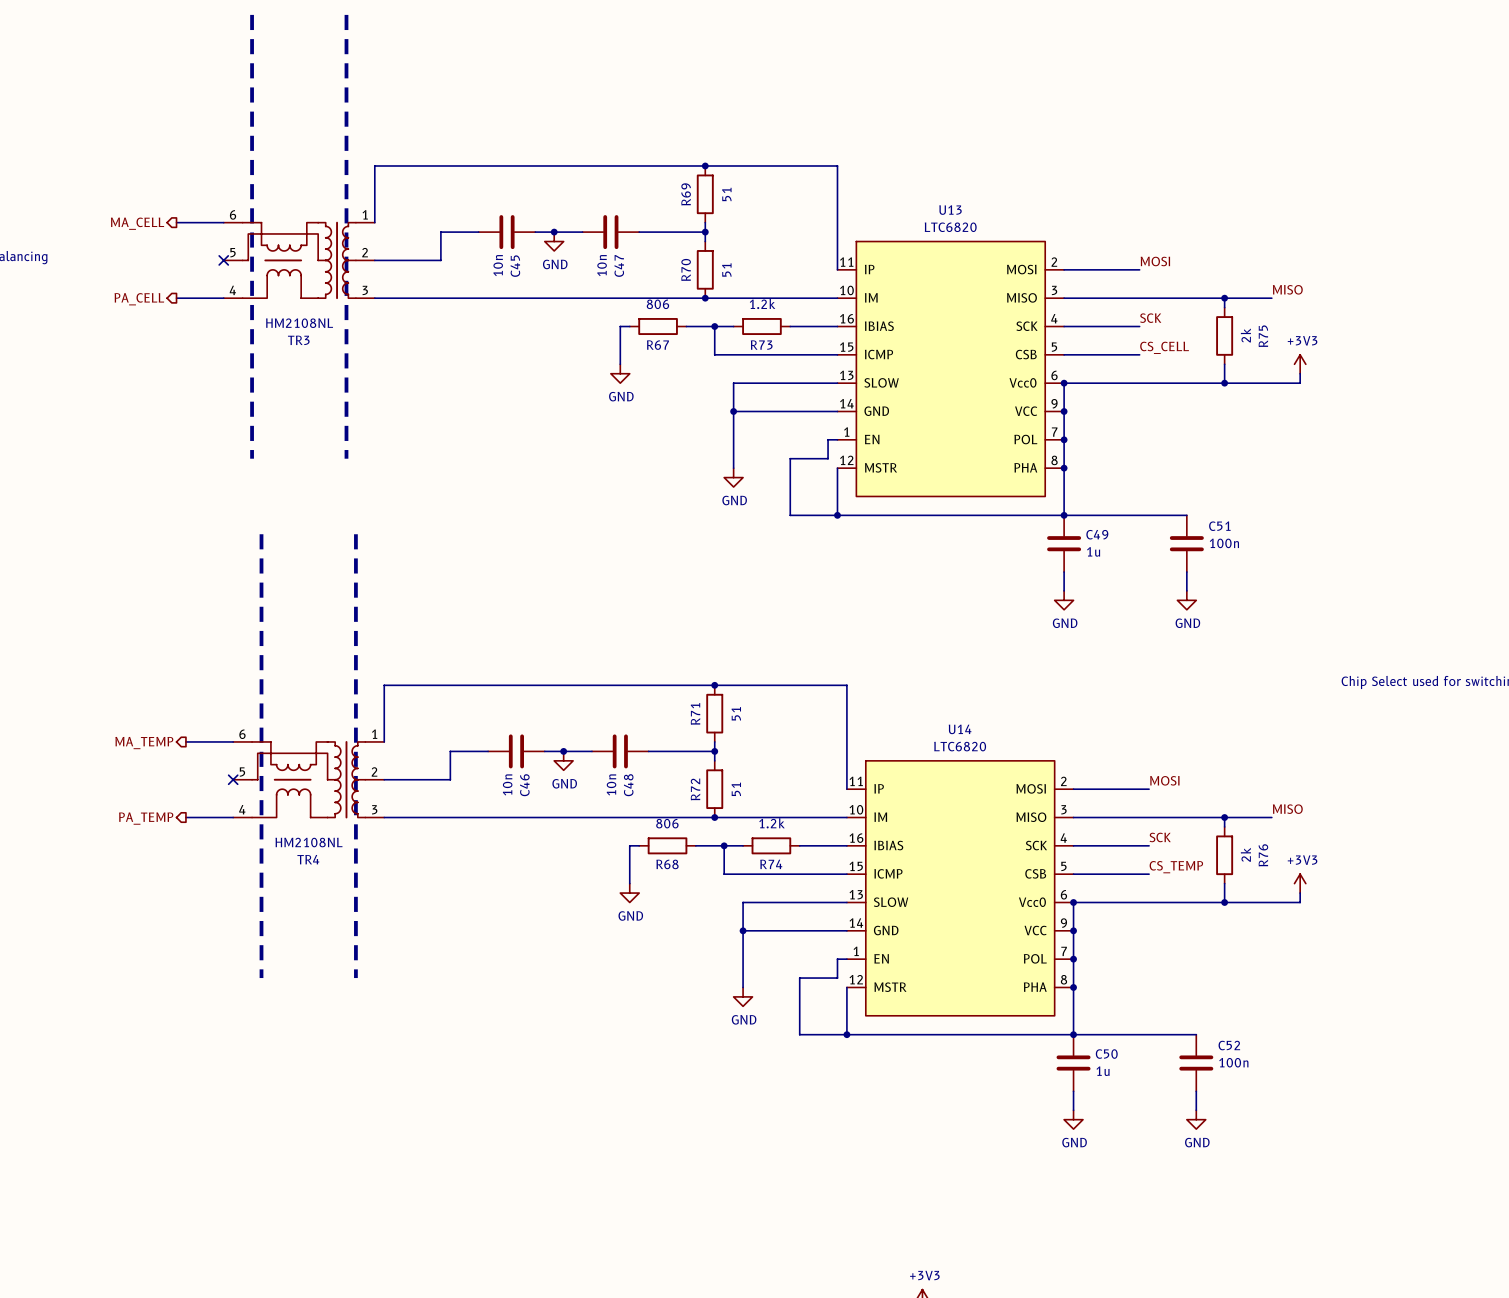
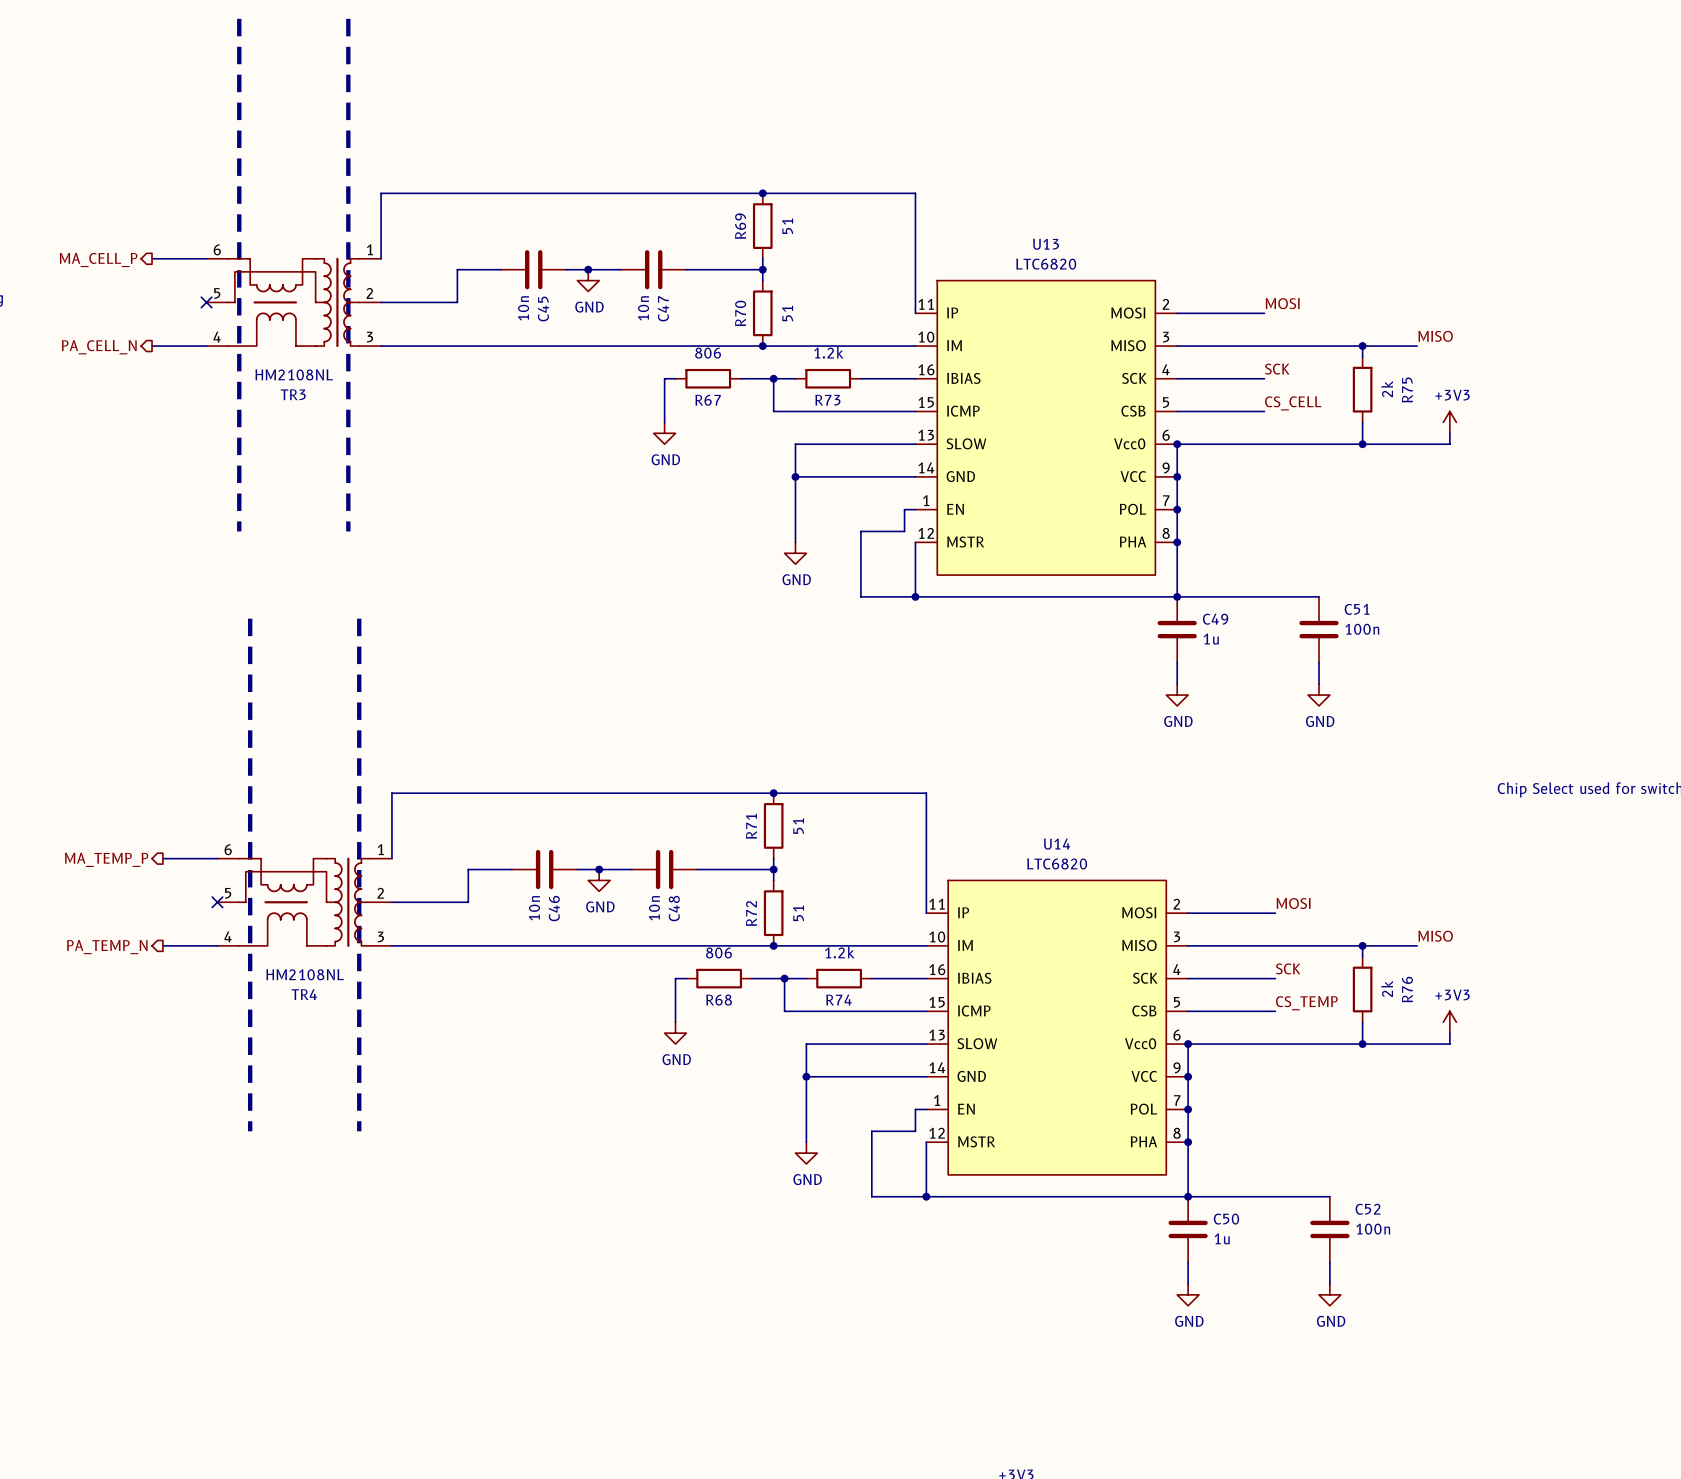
hierarchical label: MA_CELL (137, 223) -> MA_CELL_P (98, 260)
hierarchical label: PA_CELL (139, 299) -> PA_CELL_N (99, 347)
hierarchical label: MA_TEMP (144, 743) -> MA_TEMP_P (106, 859)
hierarchical label: PA_TEMP (146, 818) -> PA_TEMP_N (107, 947)

